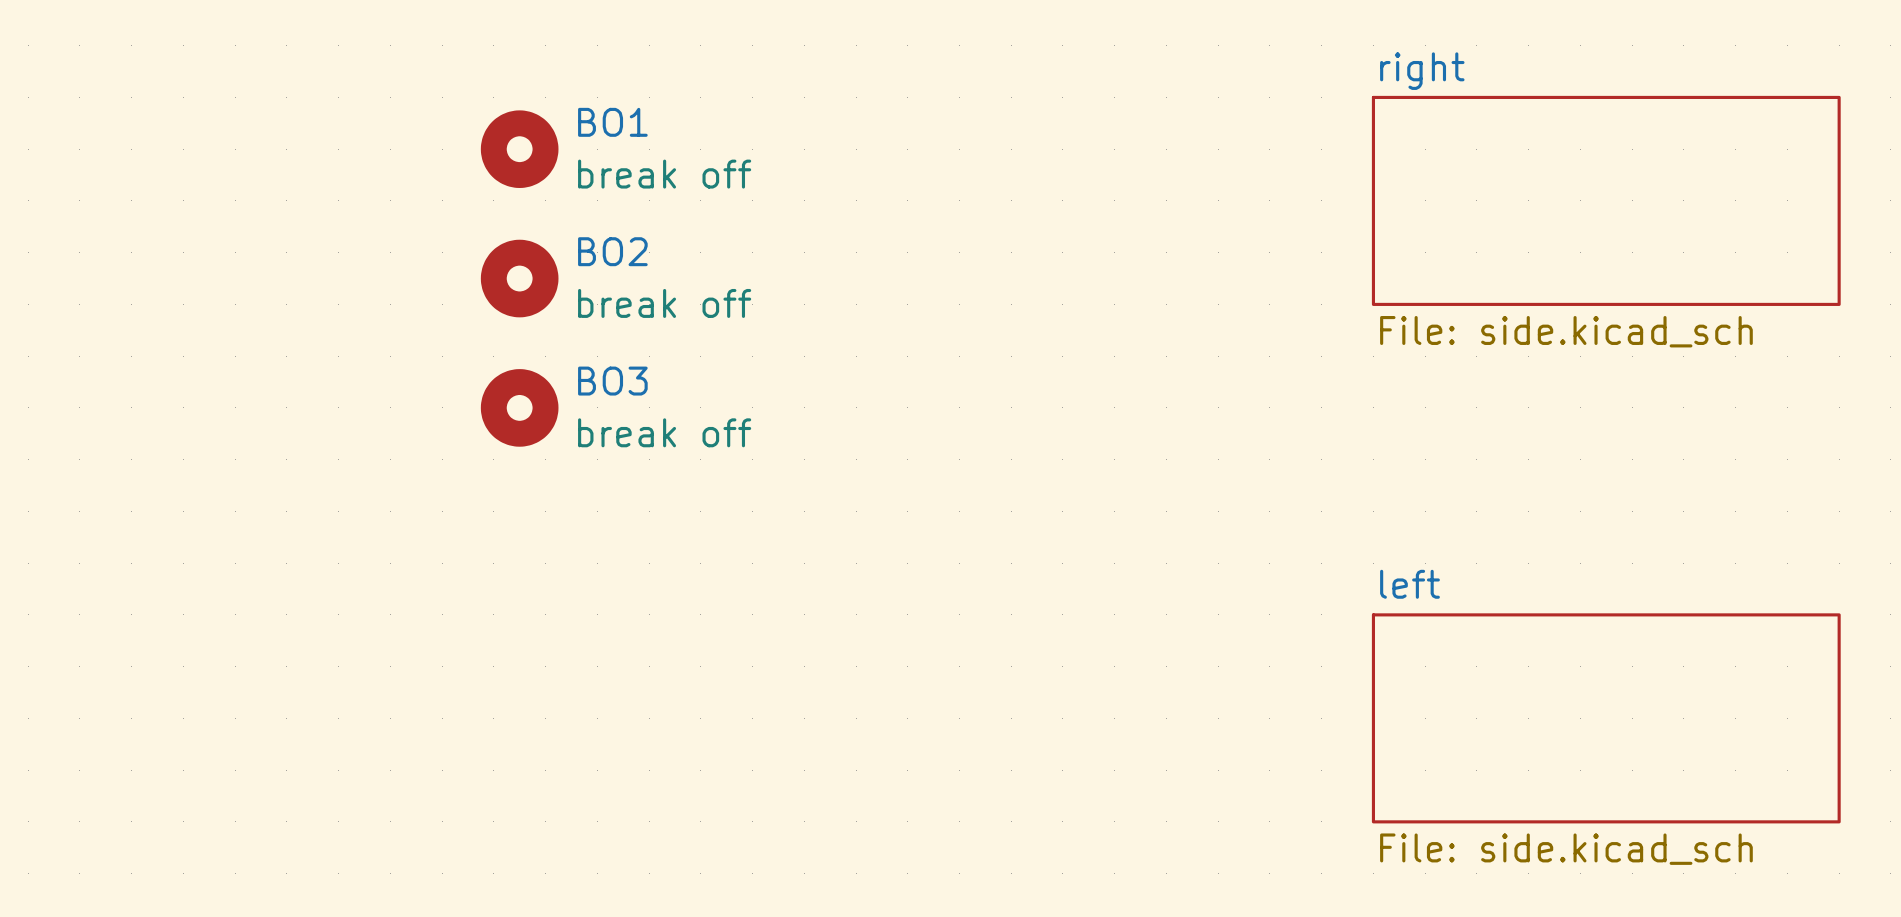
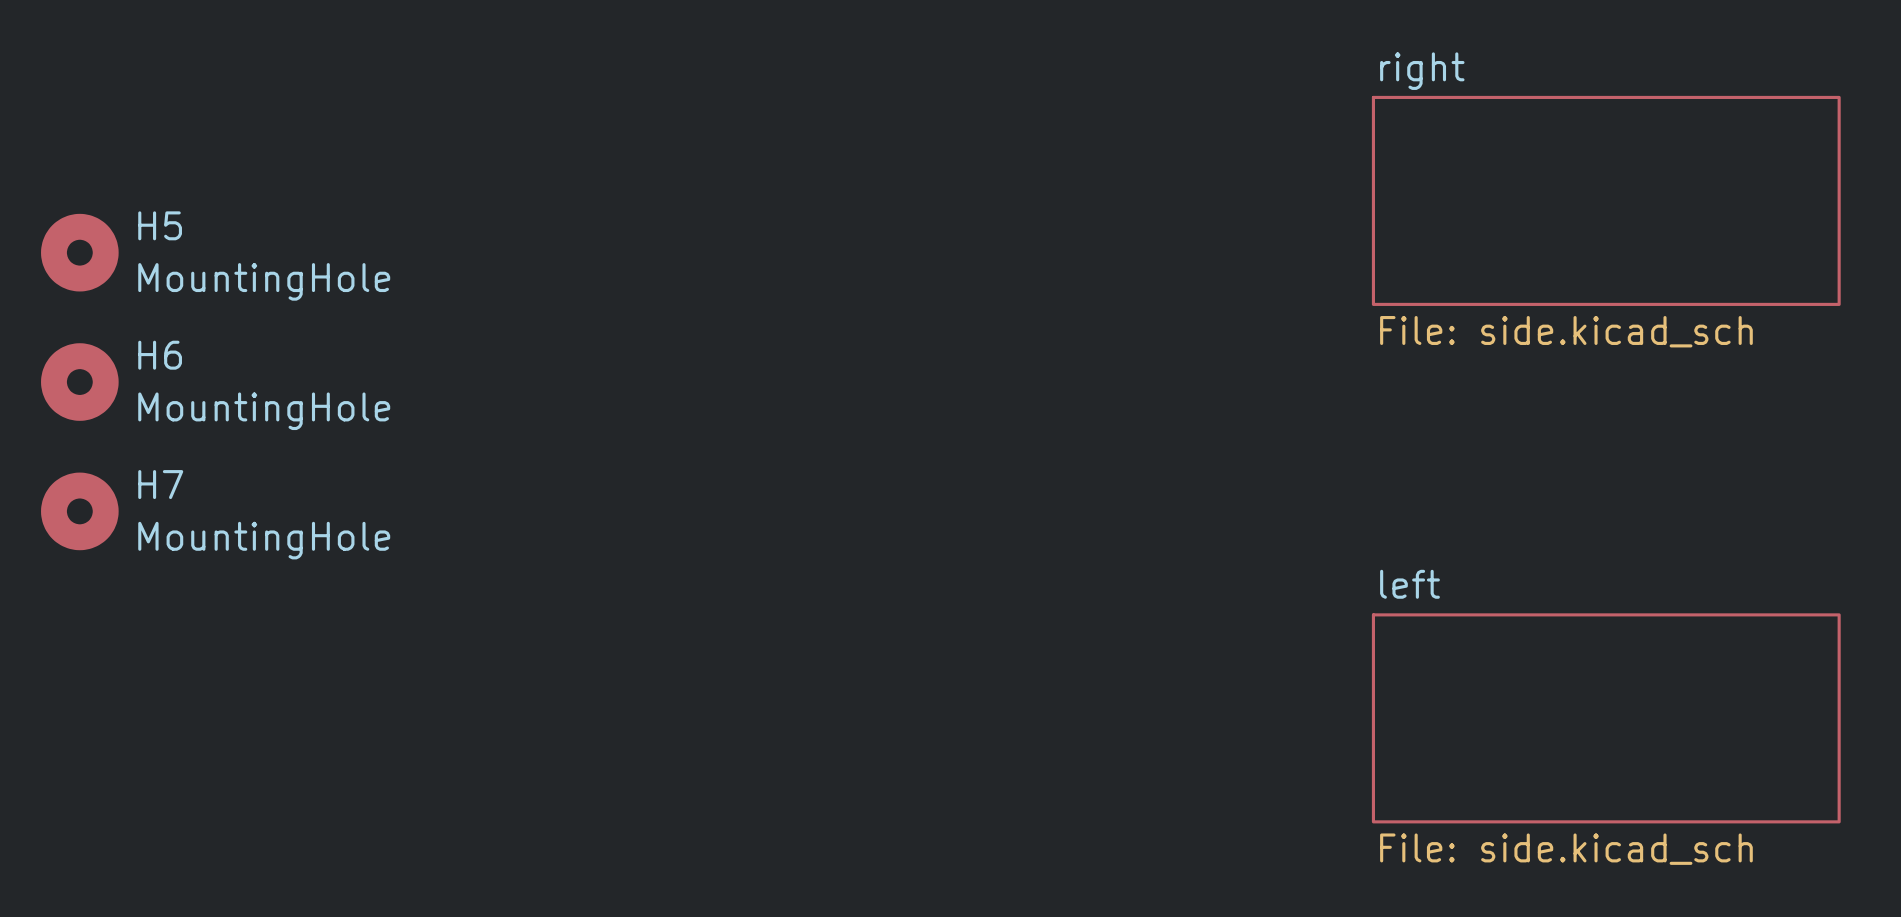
BO1: break off (519, 149) -> none
H5: none -> MountingHole (79, 252)
BO2: break off (519, 278) -> none
H6: none -> MountingHole (79, 382)
BO3: break off (519, 407) -> none
H7: none -> MountingHole (79, 511)

